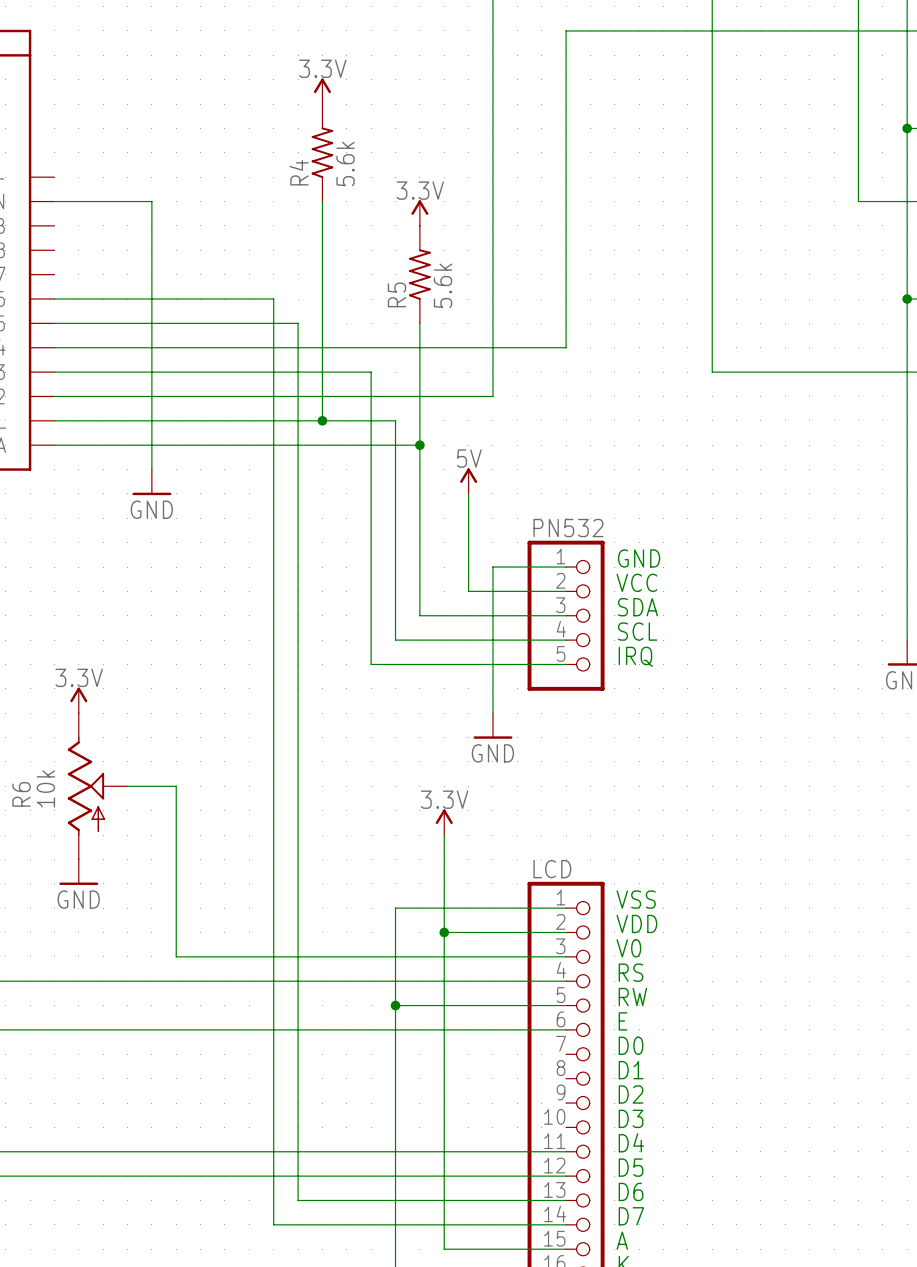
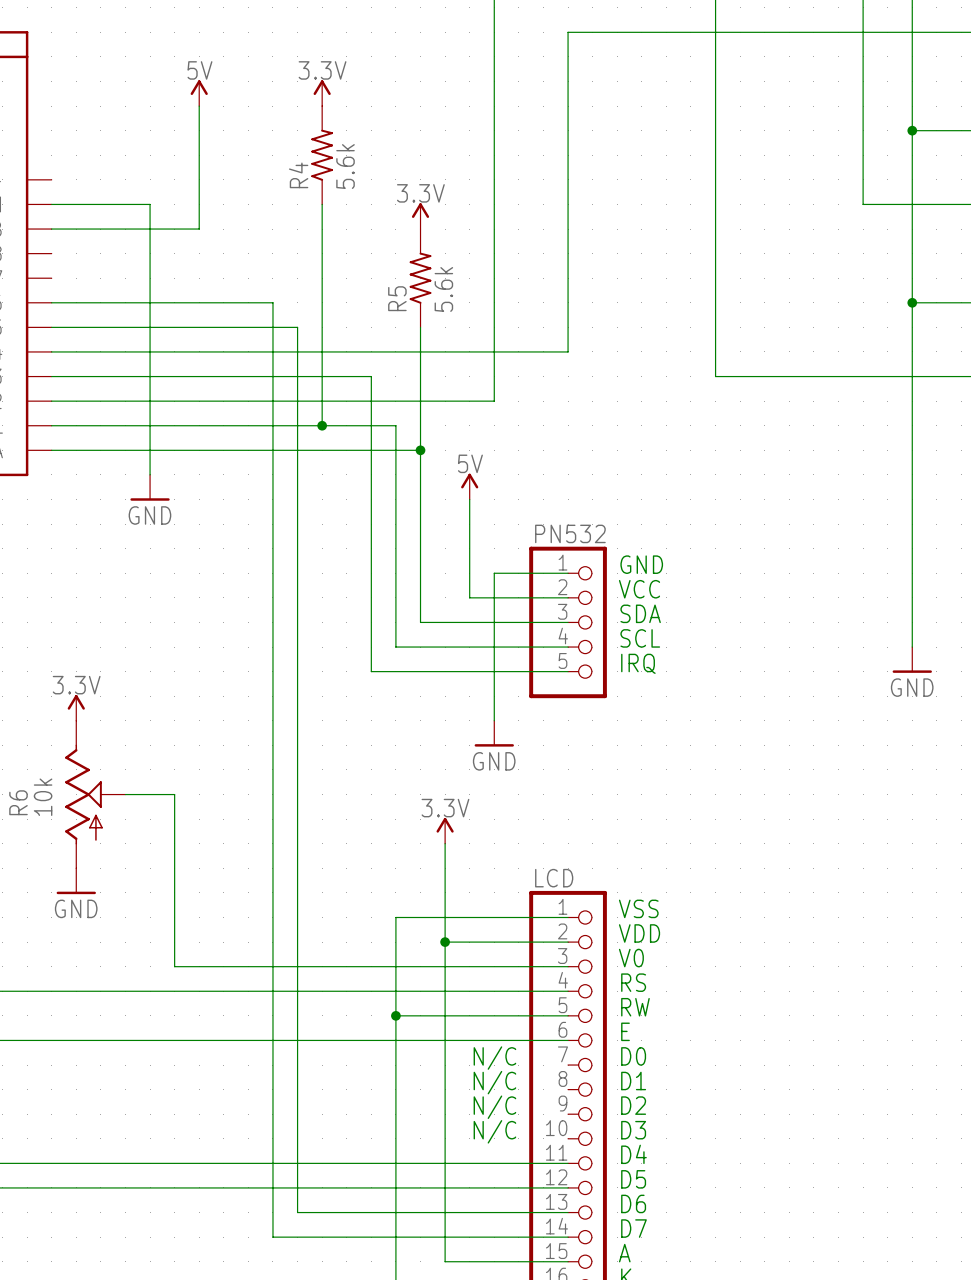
power symbol: none -> 5V (199, 93)
wire: none -> (199, 106) (199, 229) (51, 229)
text: none -> N/C (494, 1058)
text: none -> N/C (494, 1082)
text: none -> N/C (494, 1107)
text: none -> N/C (494, 1131)

